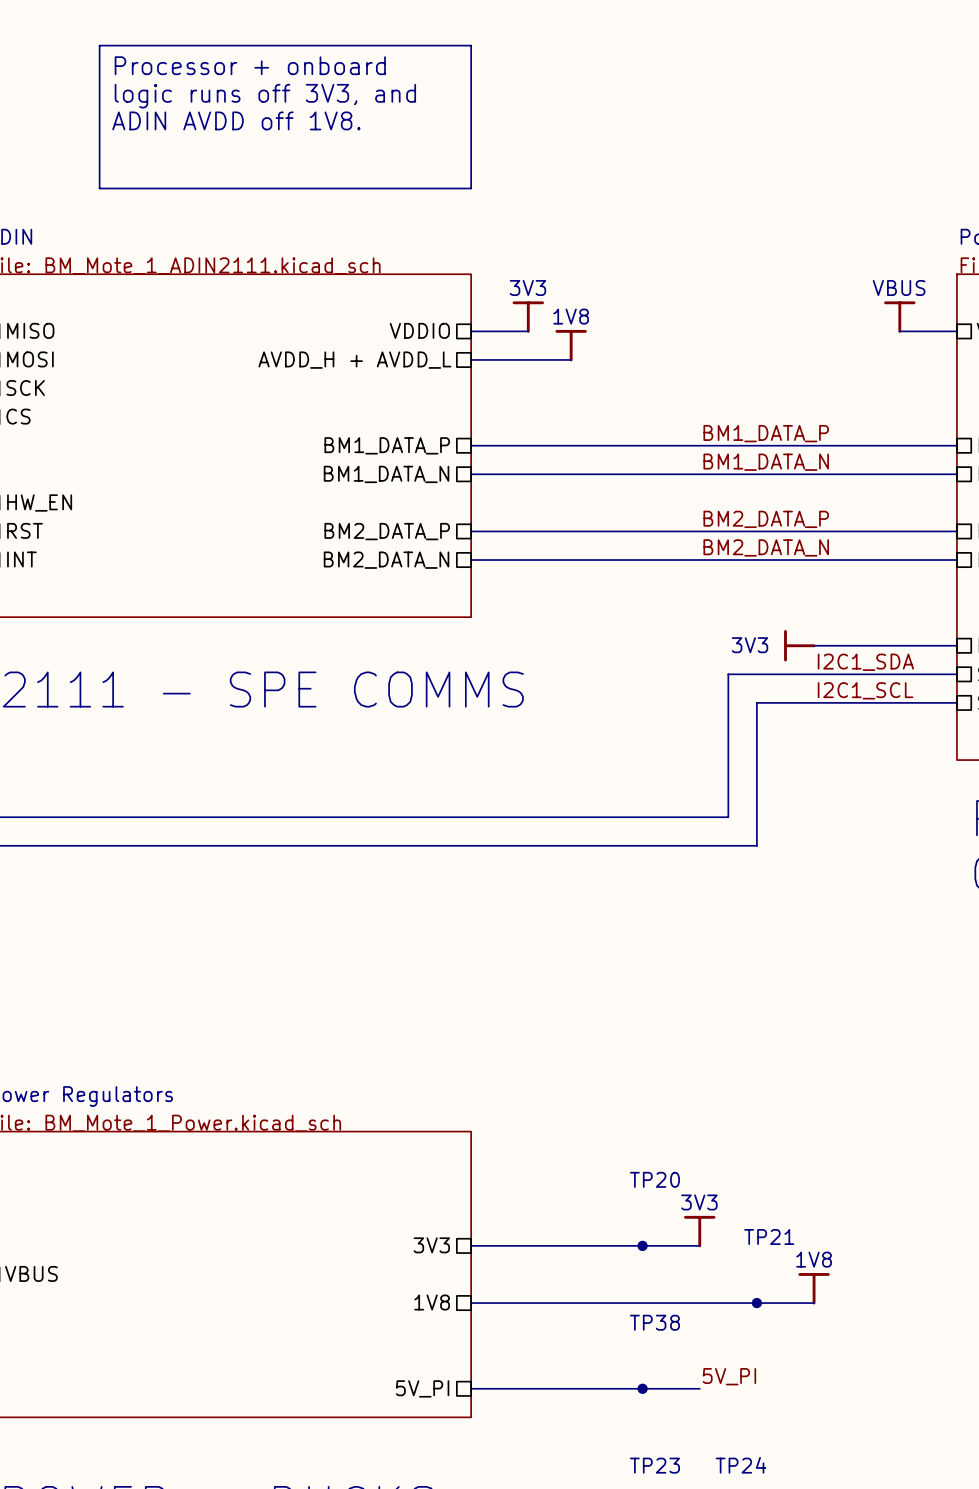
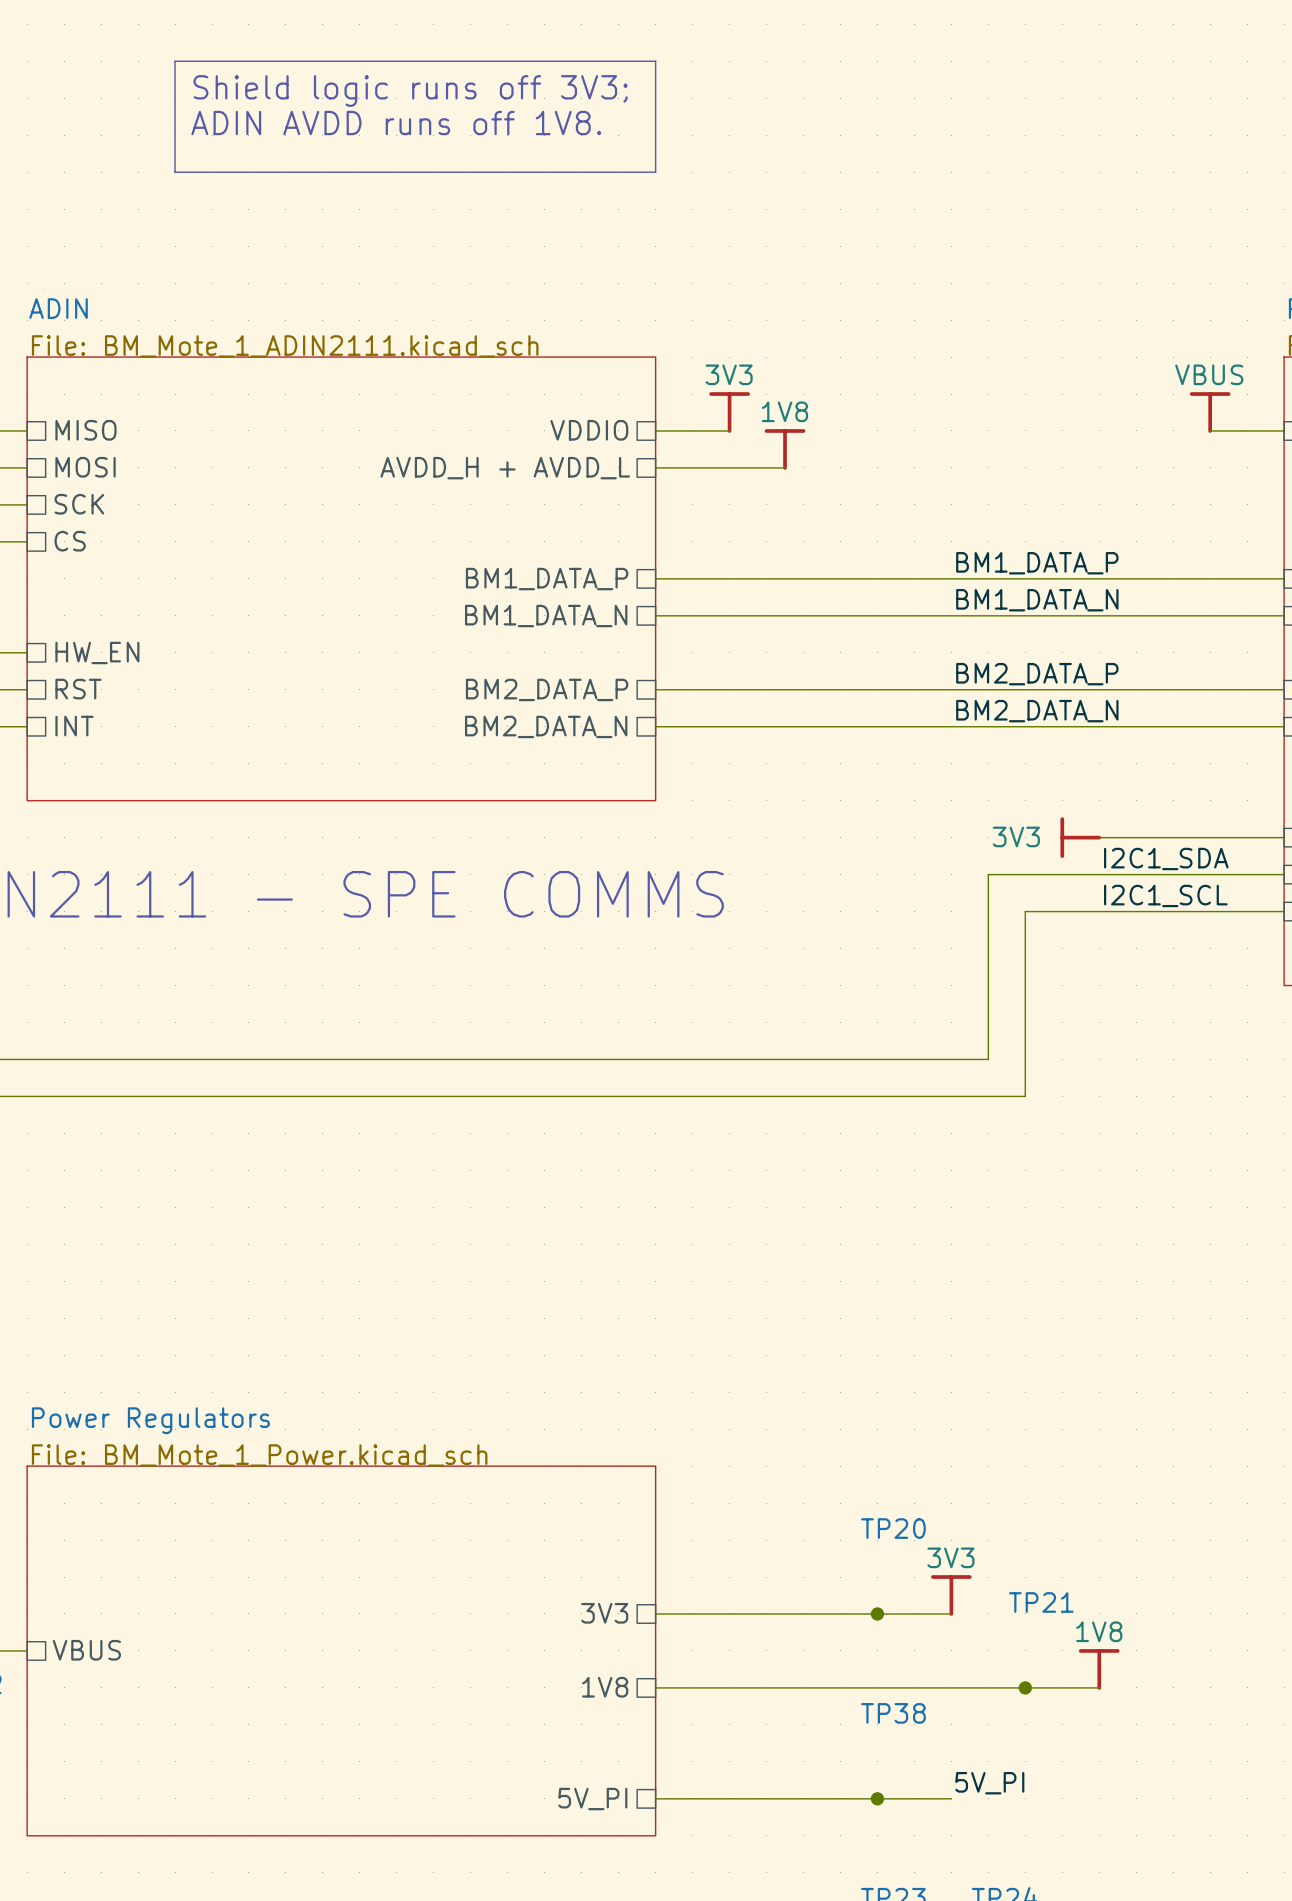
text: Processor + onboard (250, 65) -> Shield logic runs off 3V3; (410, 91)
text: logic runs off 3V3, and (265, 96) -> ADIN AVDD runs off 1V8. (396, 123)
text: ADIN AVDD off 1V8. (236, 120) -> none
line: (99, 131) (99, 188) (471, 188) (471, 131) -> (175, 172) (655, 172)

